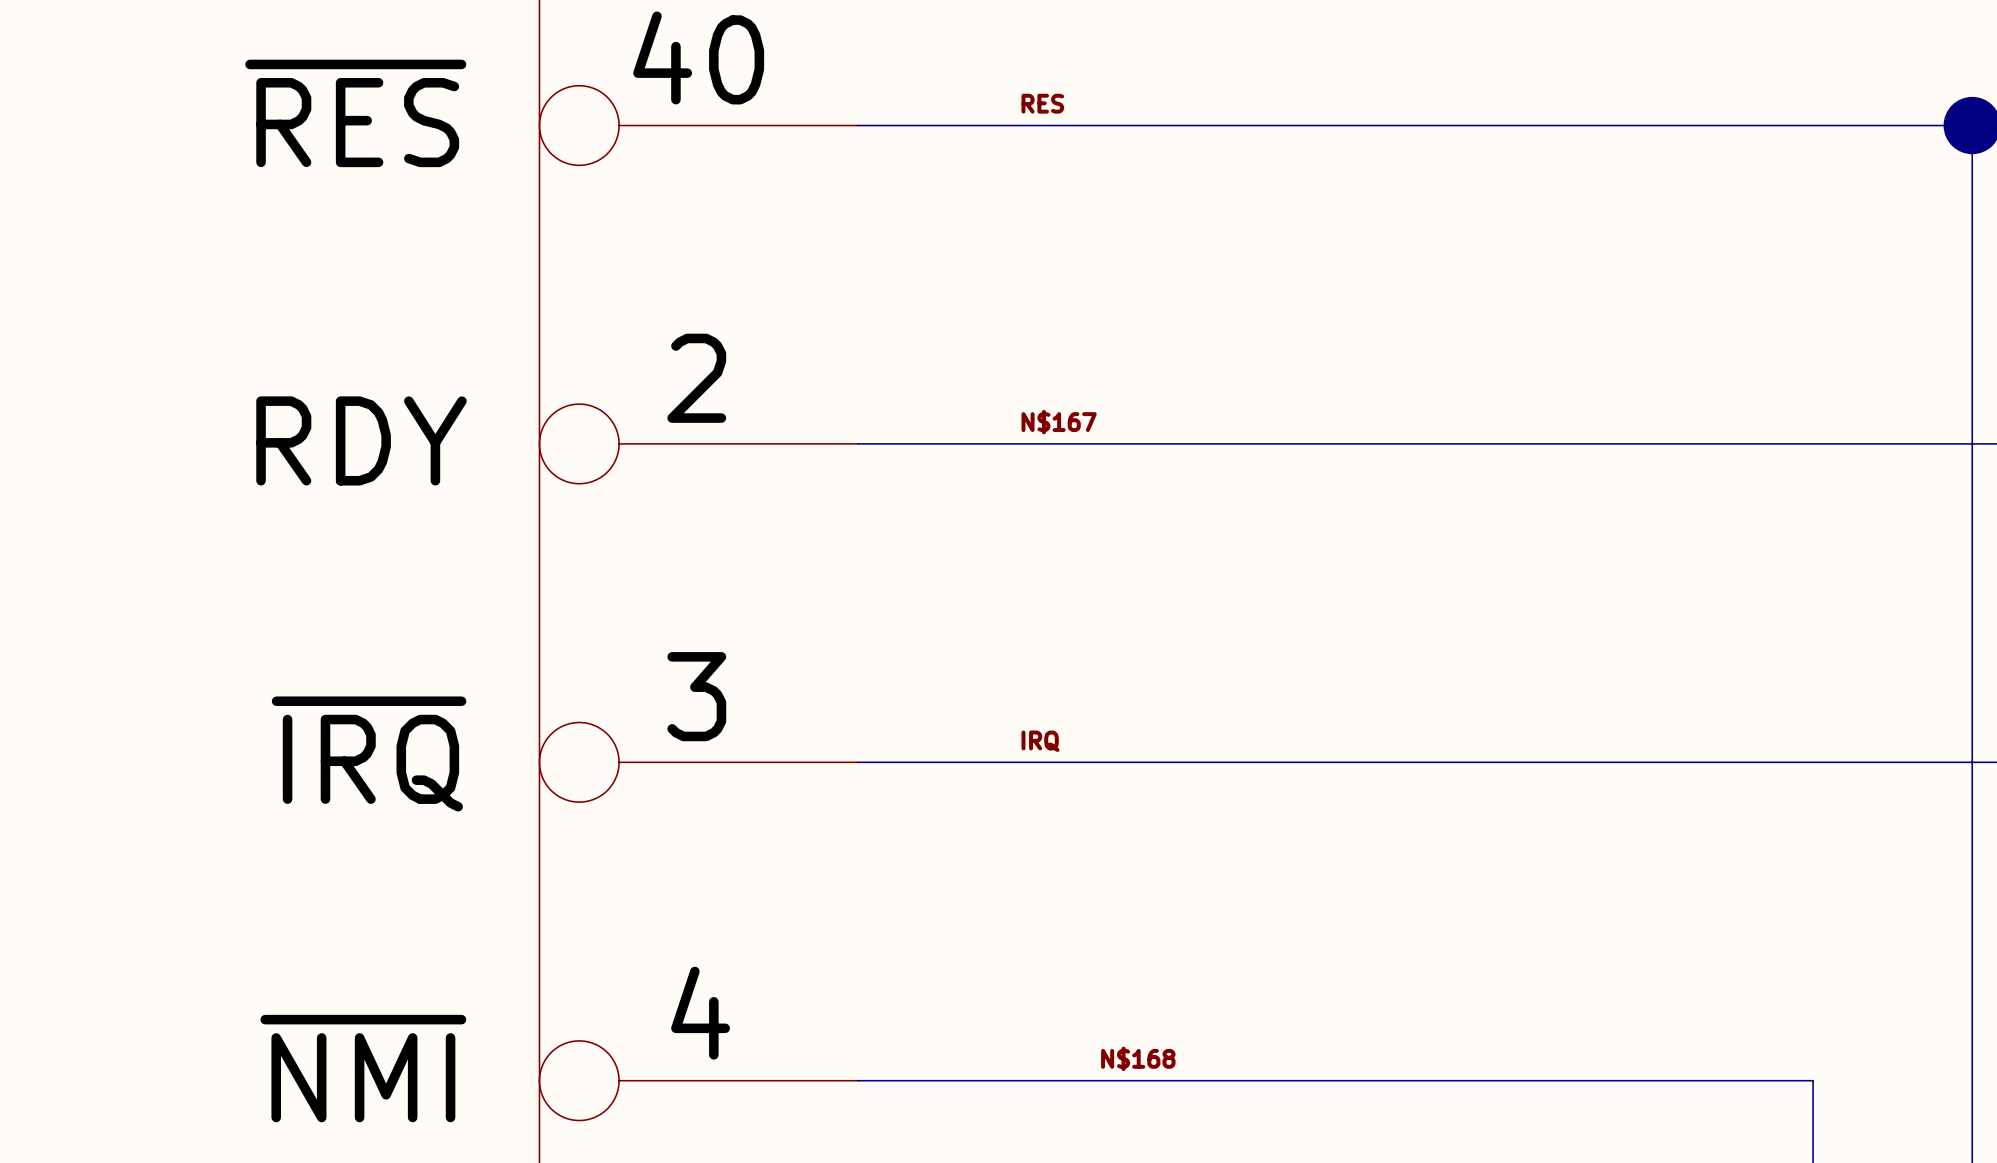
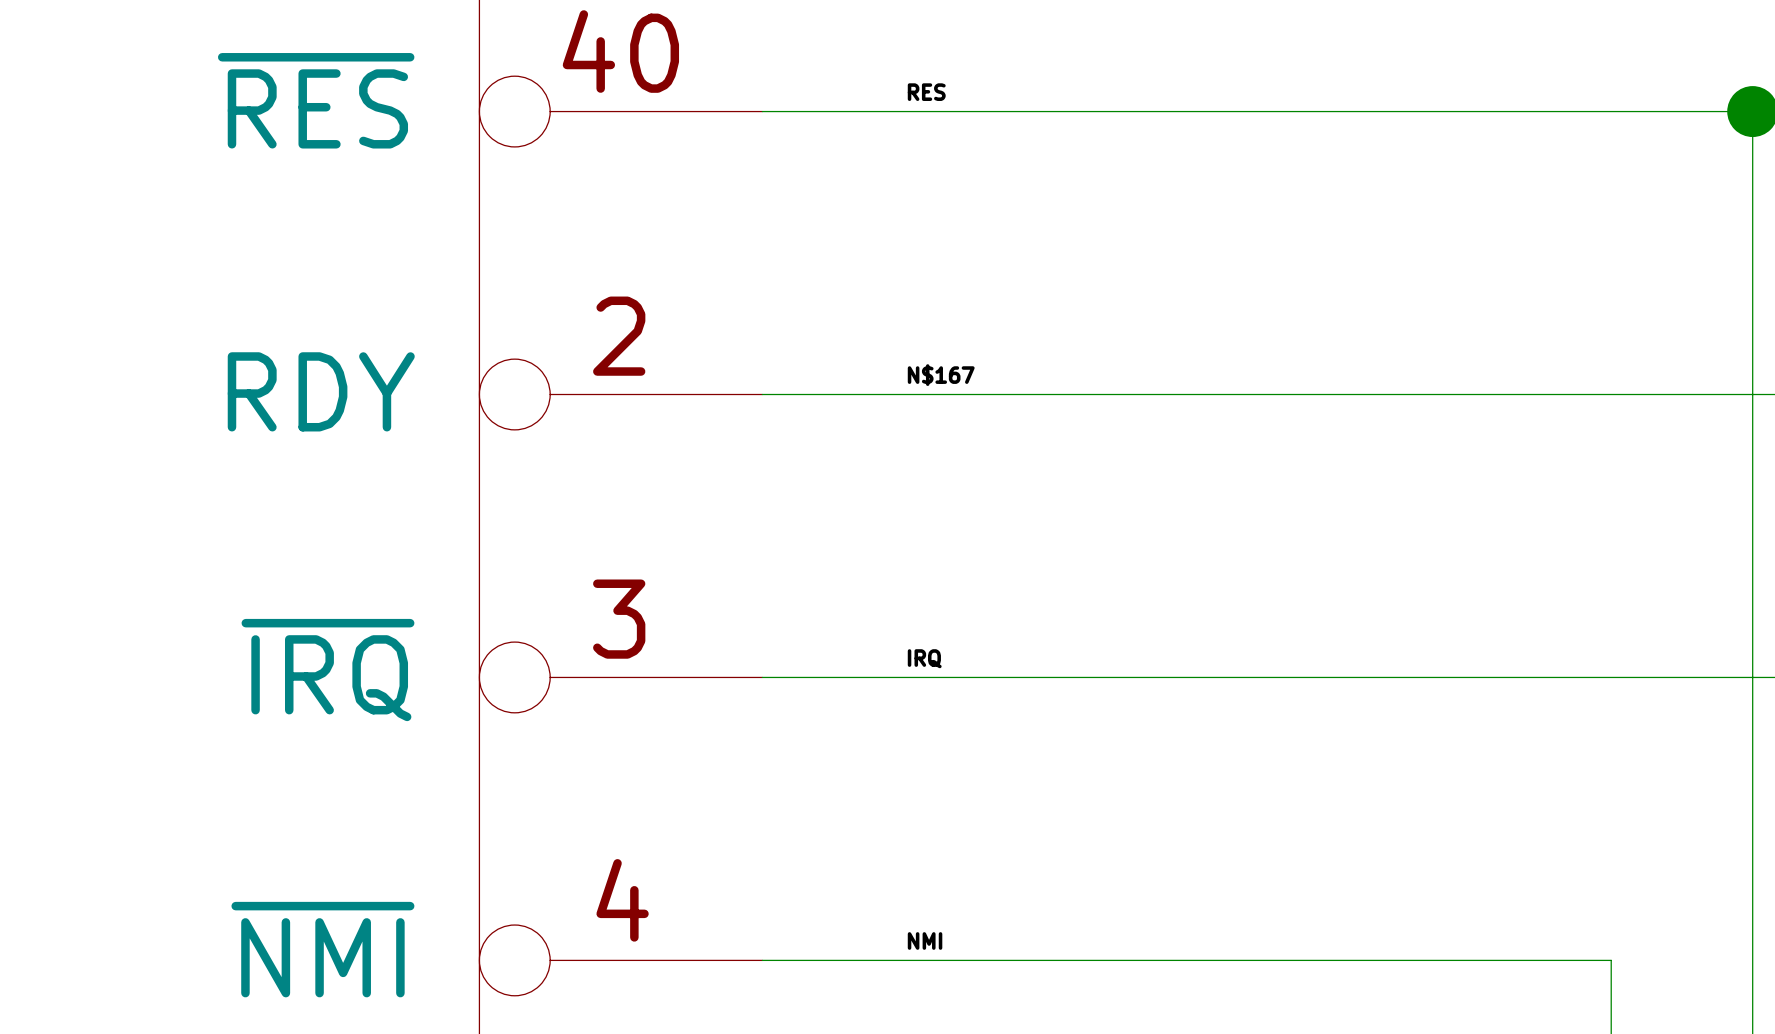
label: none -> NMI (925, 940)
label: N$168 (1138, 1058) -> none

